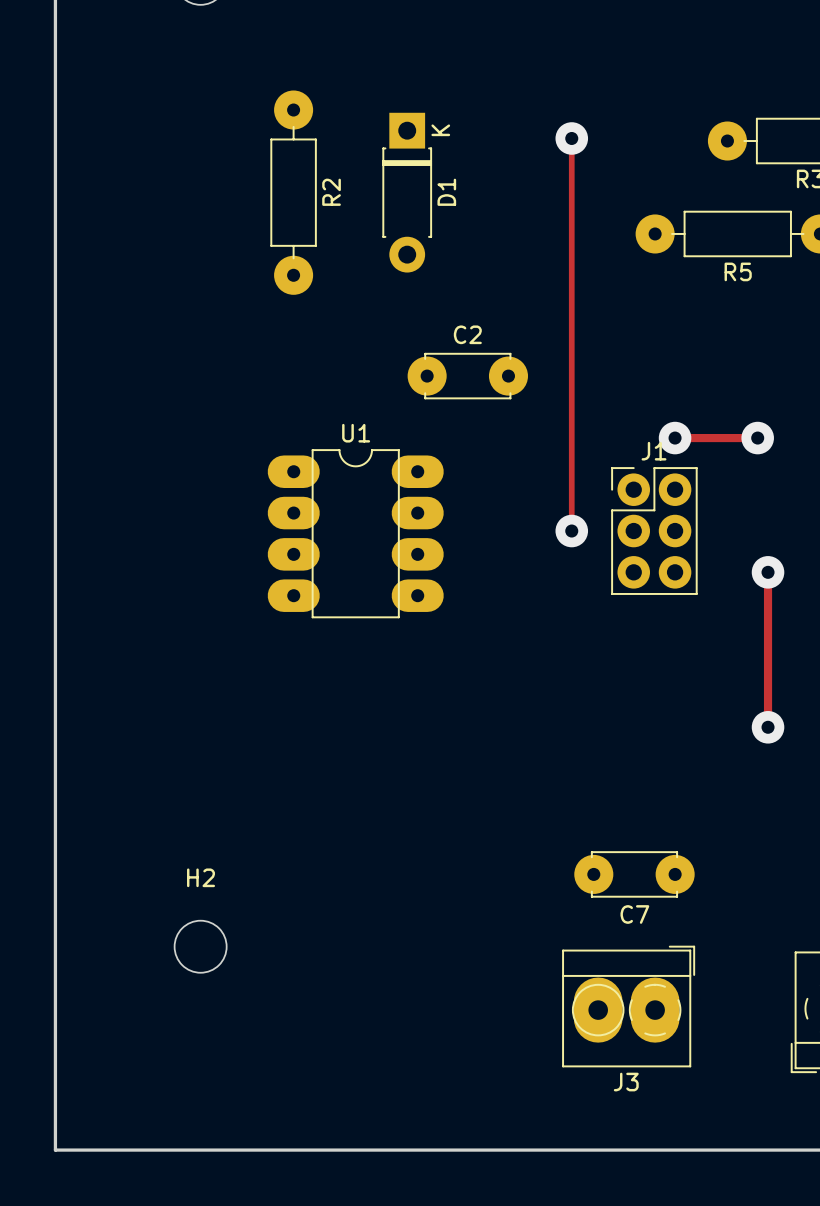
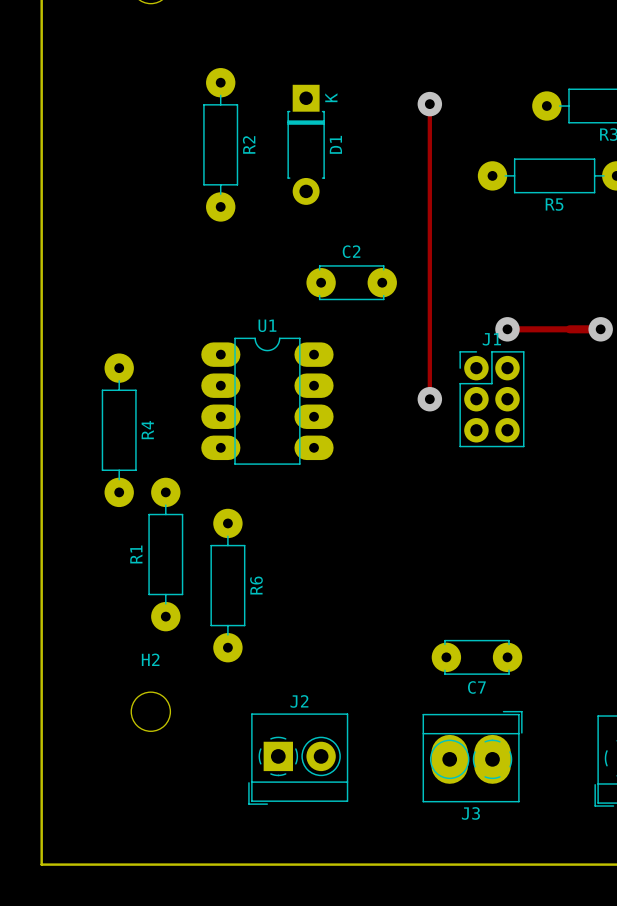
track: none -> (569, 329) (600, 329)
via position: (757, 438) -> (600, 329)
R4: none -> (119, 430)
track: (768, 572) (768, 727) -> none
via: (768, 572) -> none
via: (768, 727) -> none
R1: none -> (165, 554)
R6: none -> (227, 585)
J2: none -> (298, 759)

